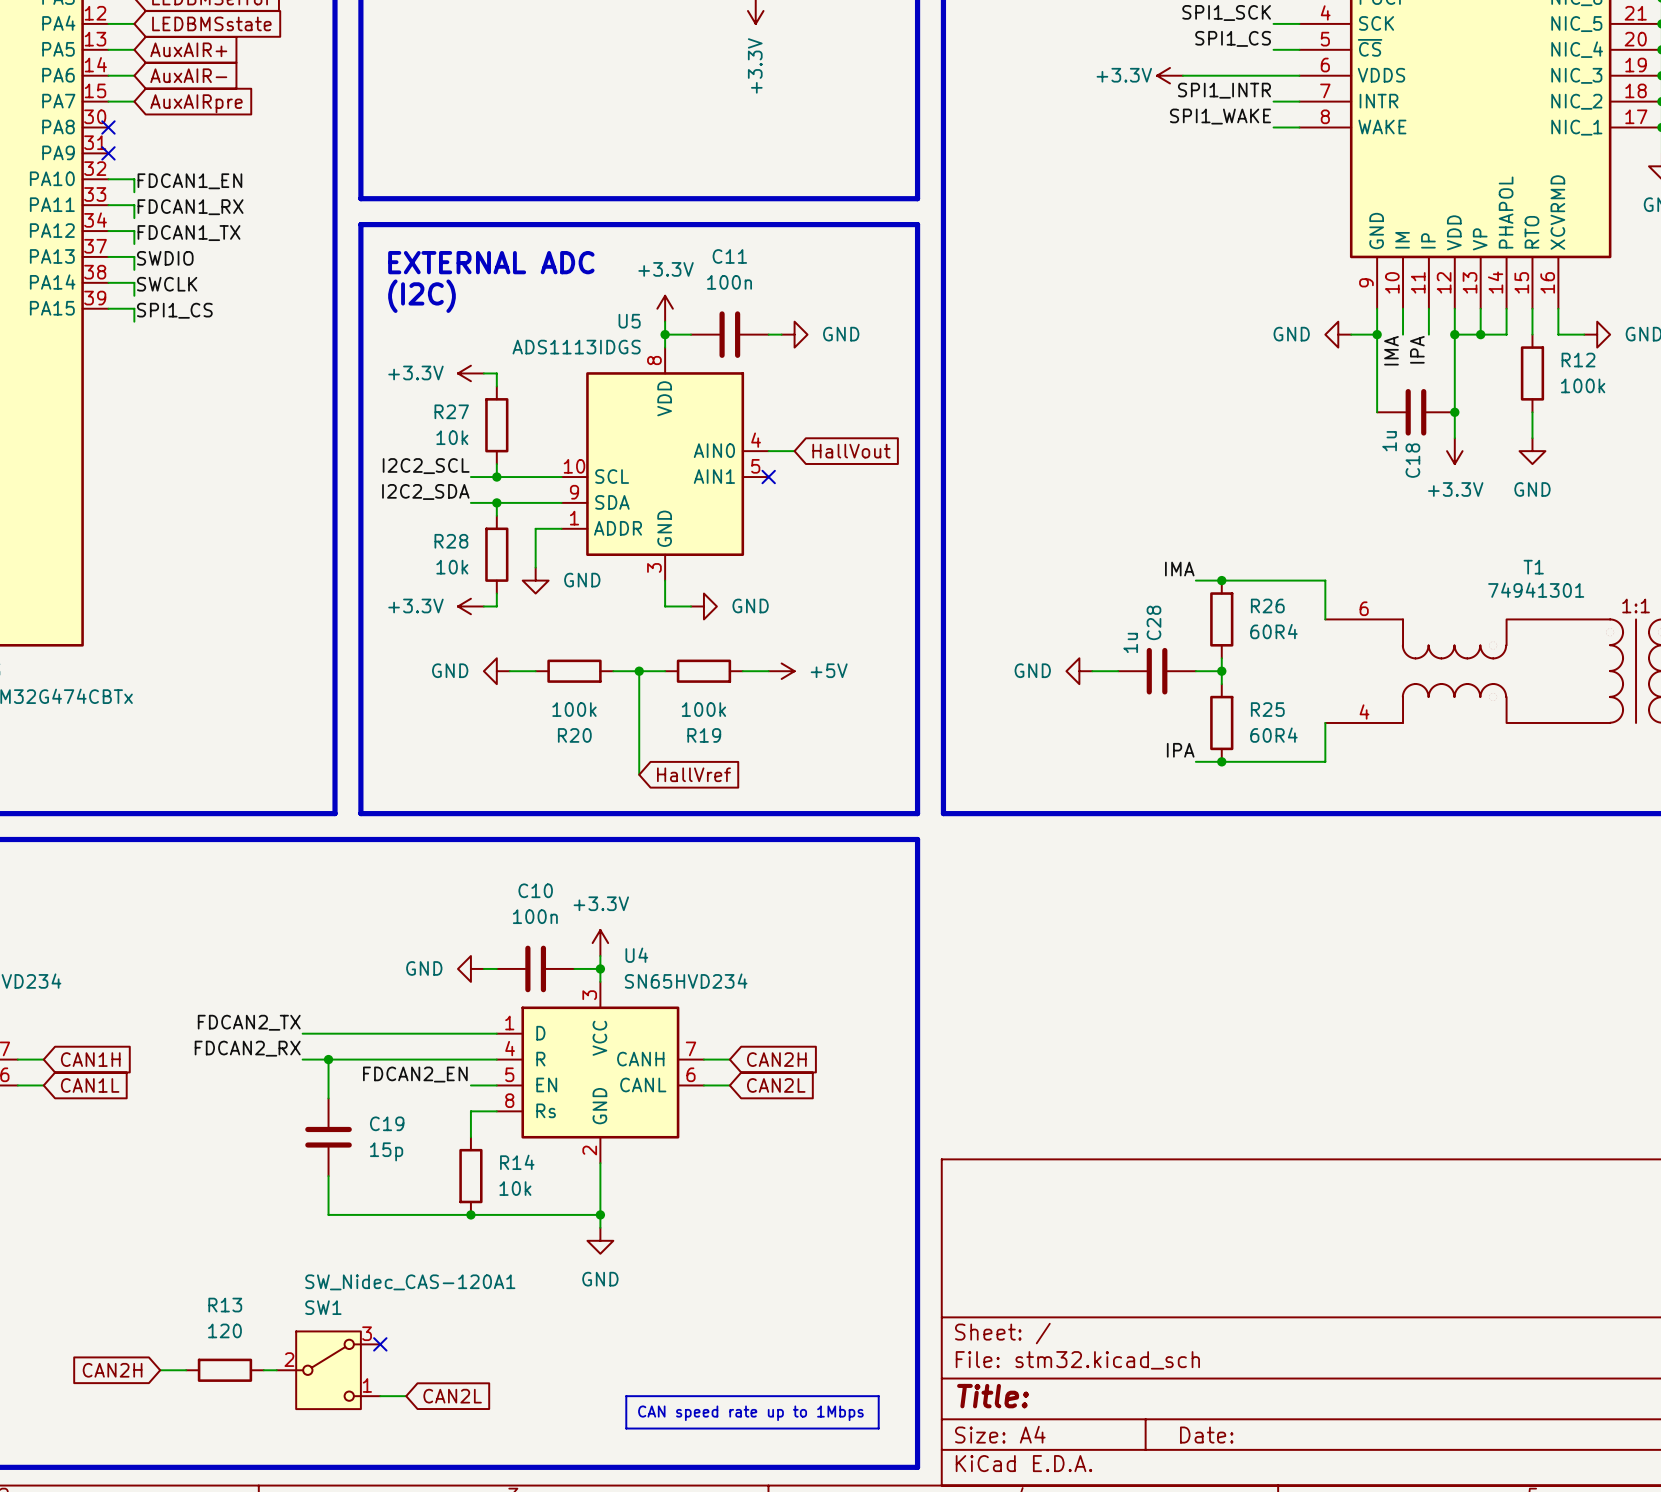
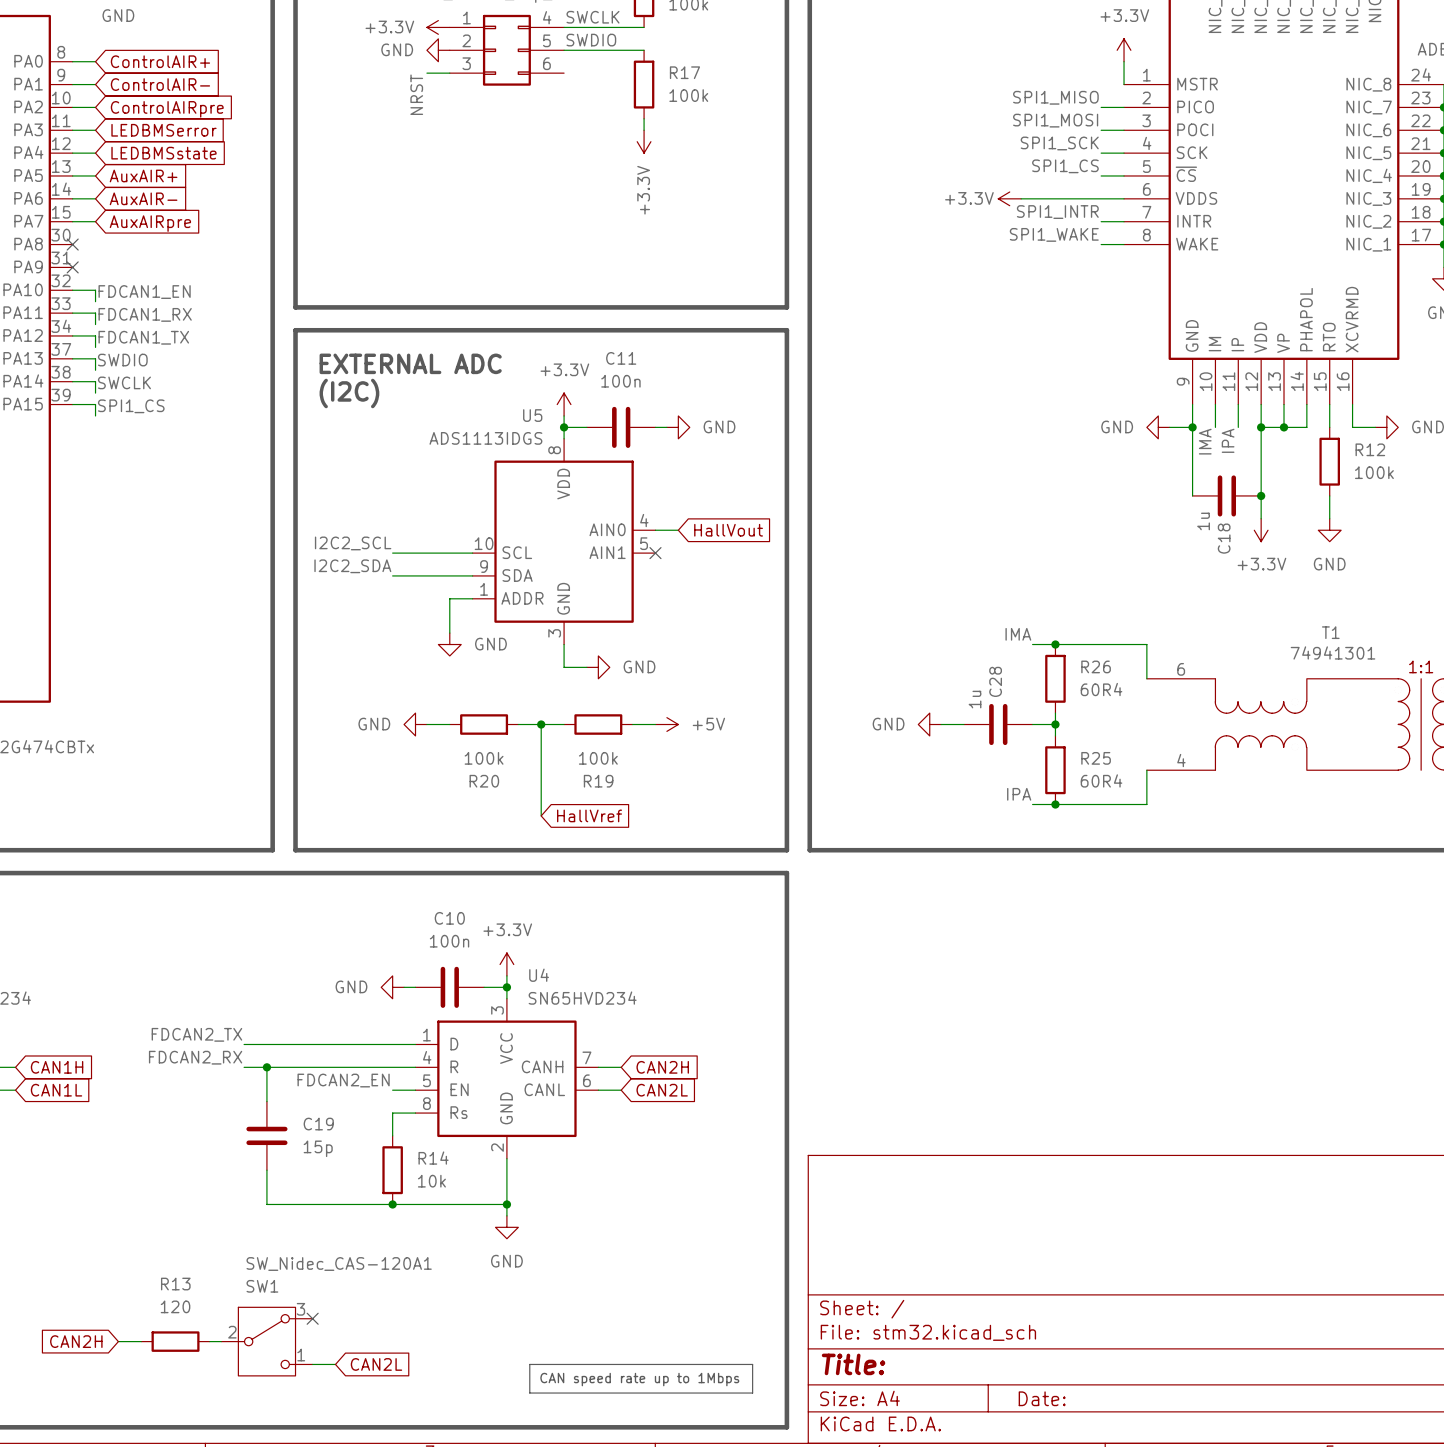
power symbol: +3.3V (470, 373) -> none
wire: (483, 373) (496, 373) (496, 386) -> none
R27: 10k (496, 425) -> none
wire: (496, 464) (496, 477) -> none
junction: (496, 477) -> none
wire: (496, 502) (496, 515) -> none
junction: (496, 502) -> none
R28: 10k (496, 554) -> none
wire: (496, 593) (496, 606) (483, 606) -> none
power symbol: +3.3V (470, 606) -> none

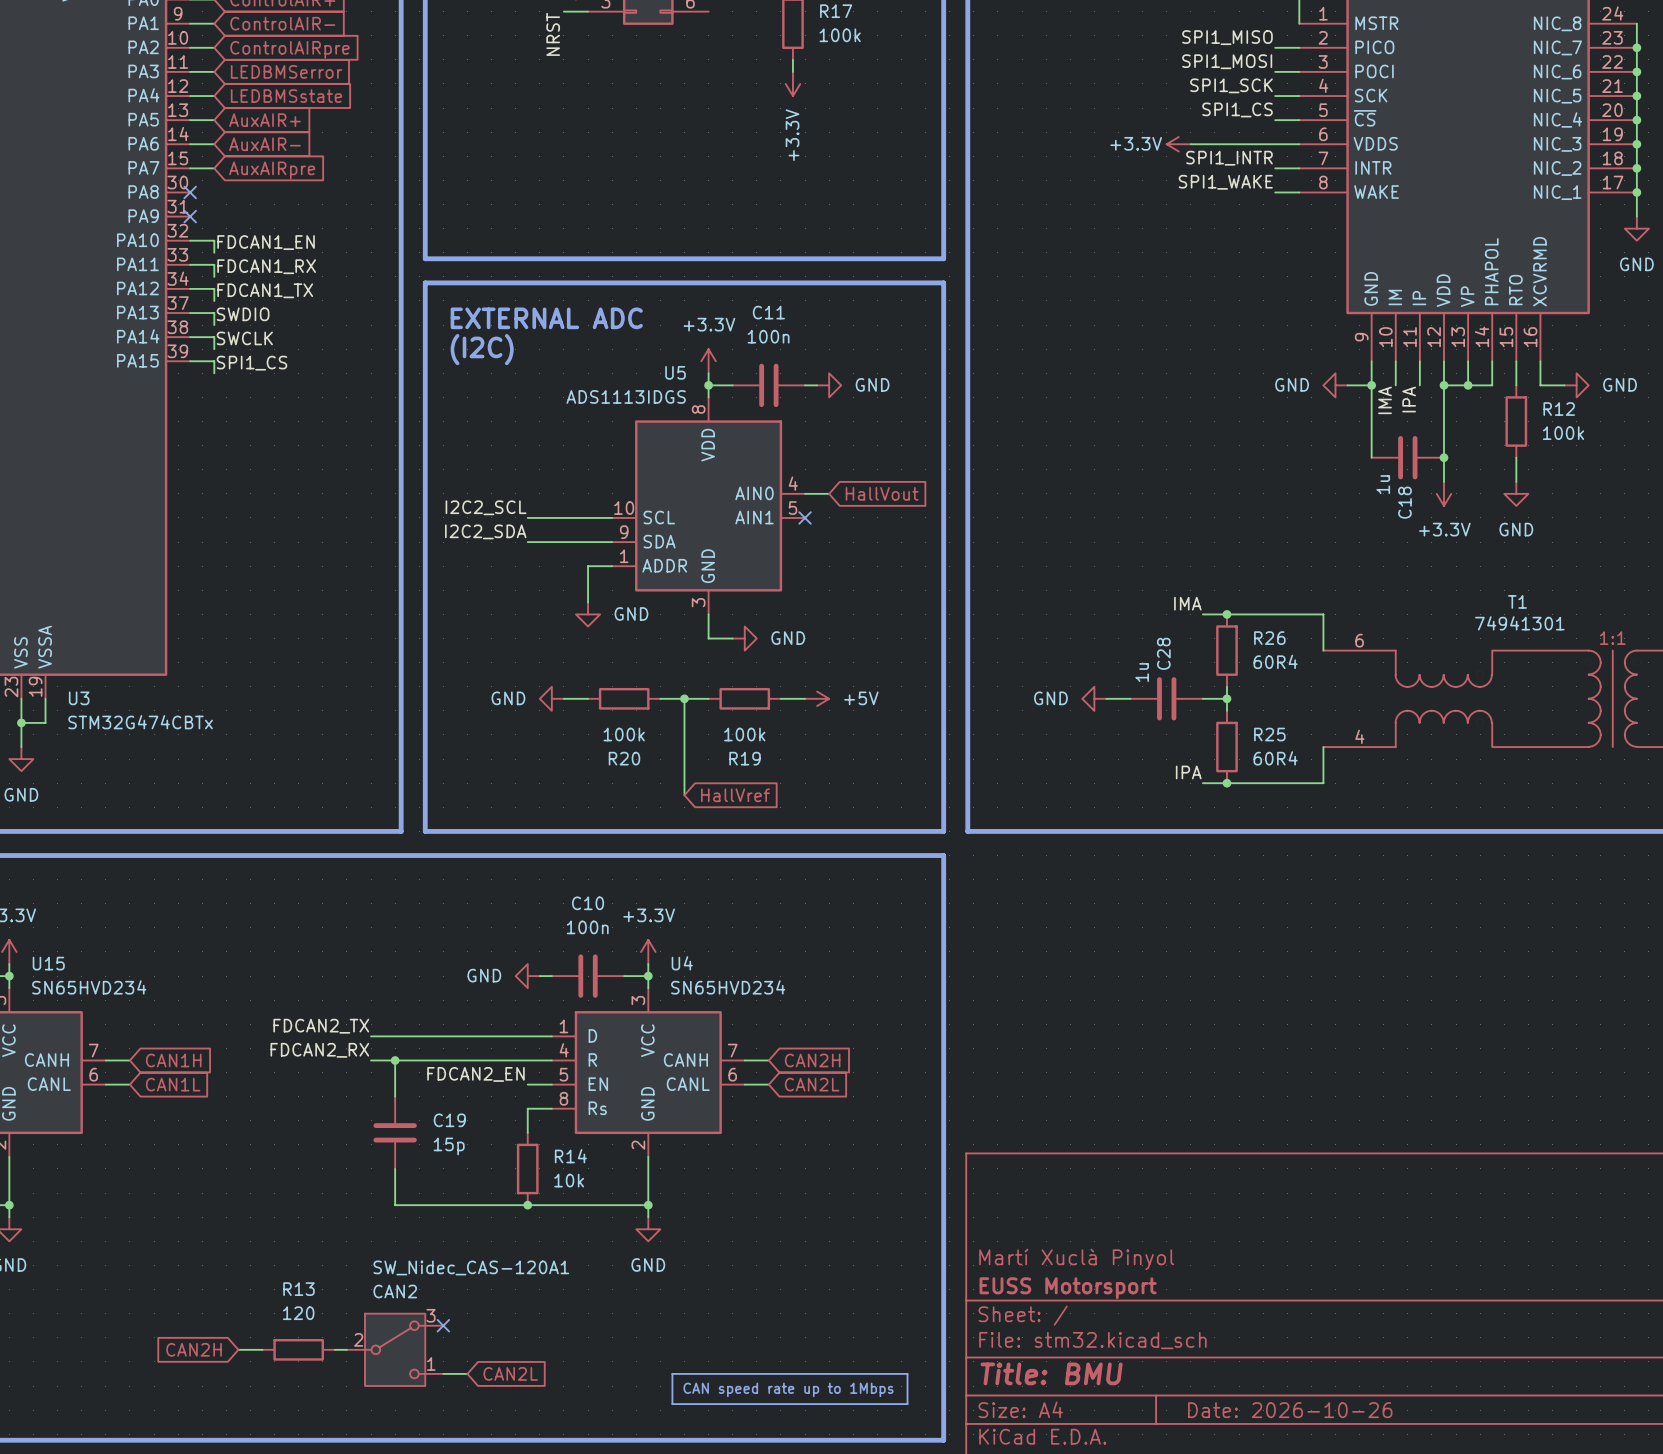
title block: none -> Martí Xuclà Pinyol (1076, 1259)
title block: none -> EUSS Motorsport (1068, 1288)
SW1 name: SW1 (262, 1286) -> CAN2 (395, 1291)
title block: Title: (853, 1364) -> Title: BMU (1051, 1373)
title block: Date: (1042, 1398) -> Date: 2026-10-26 (1290, 1410)

